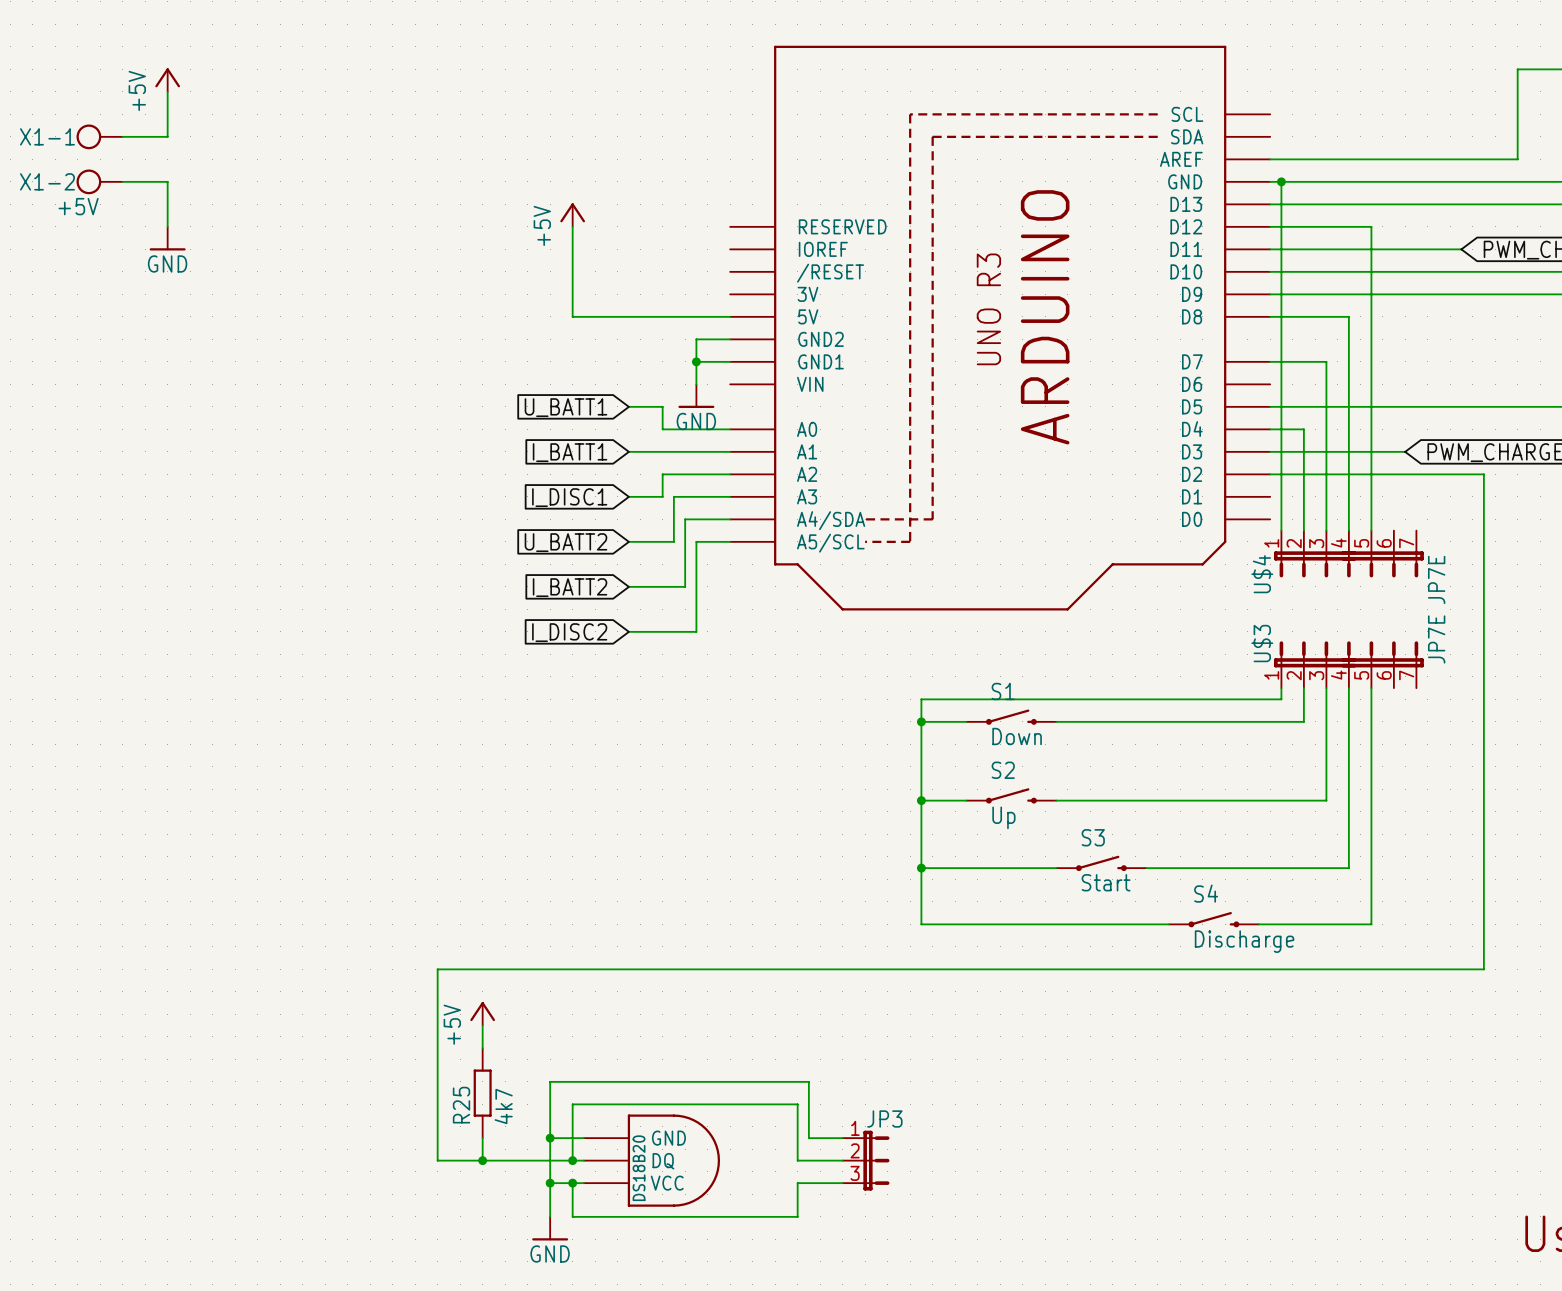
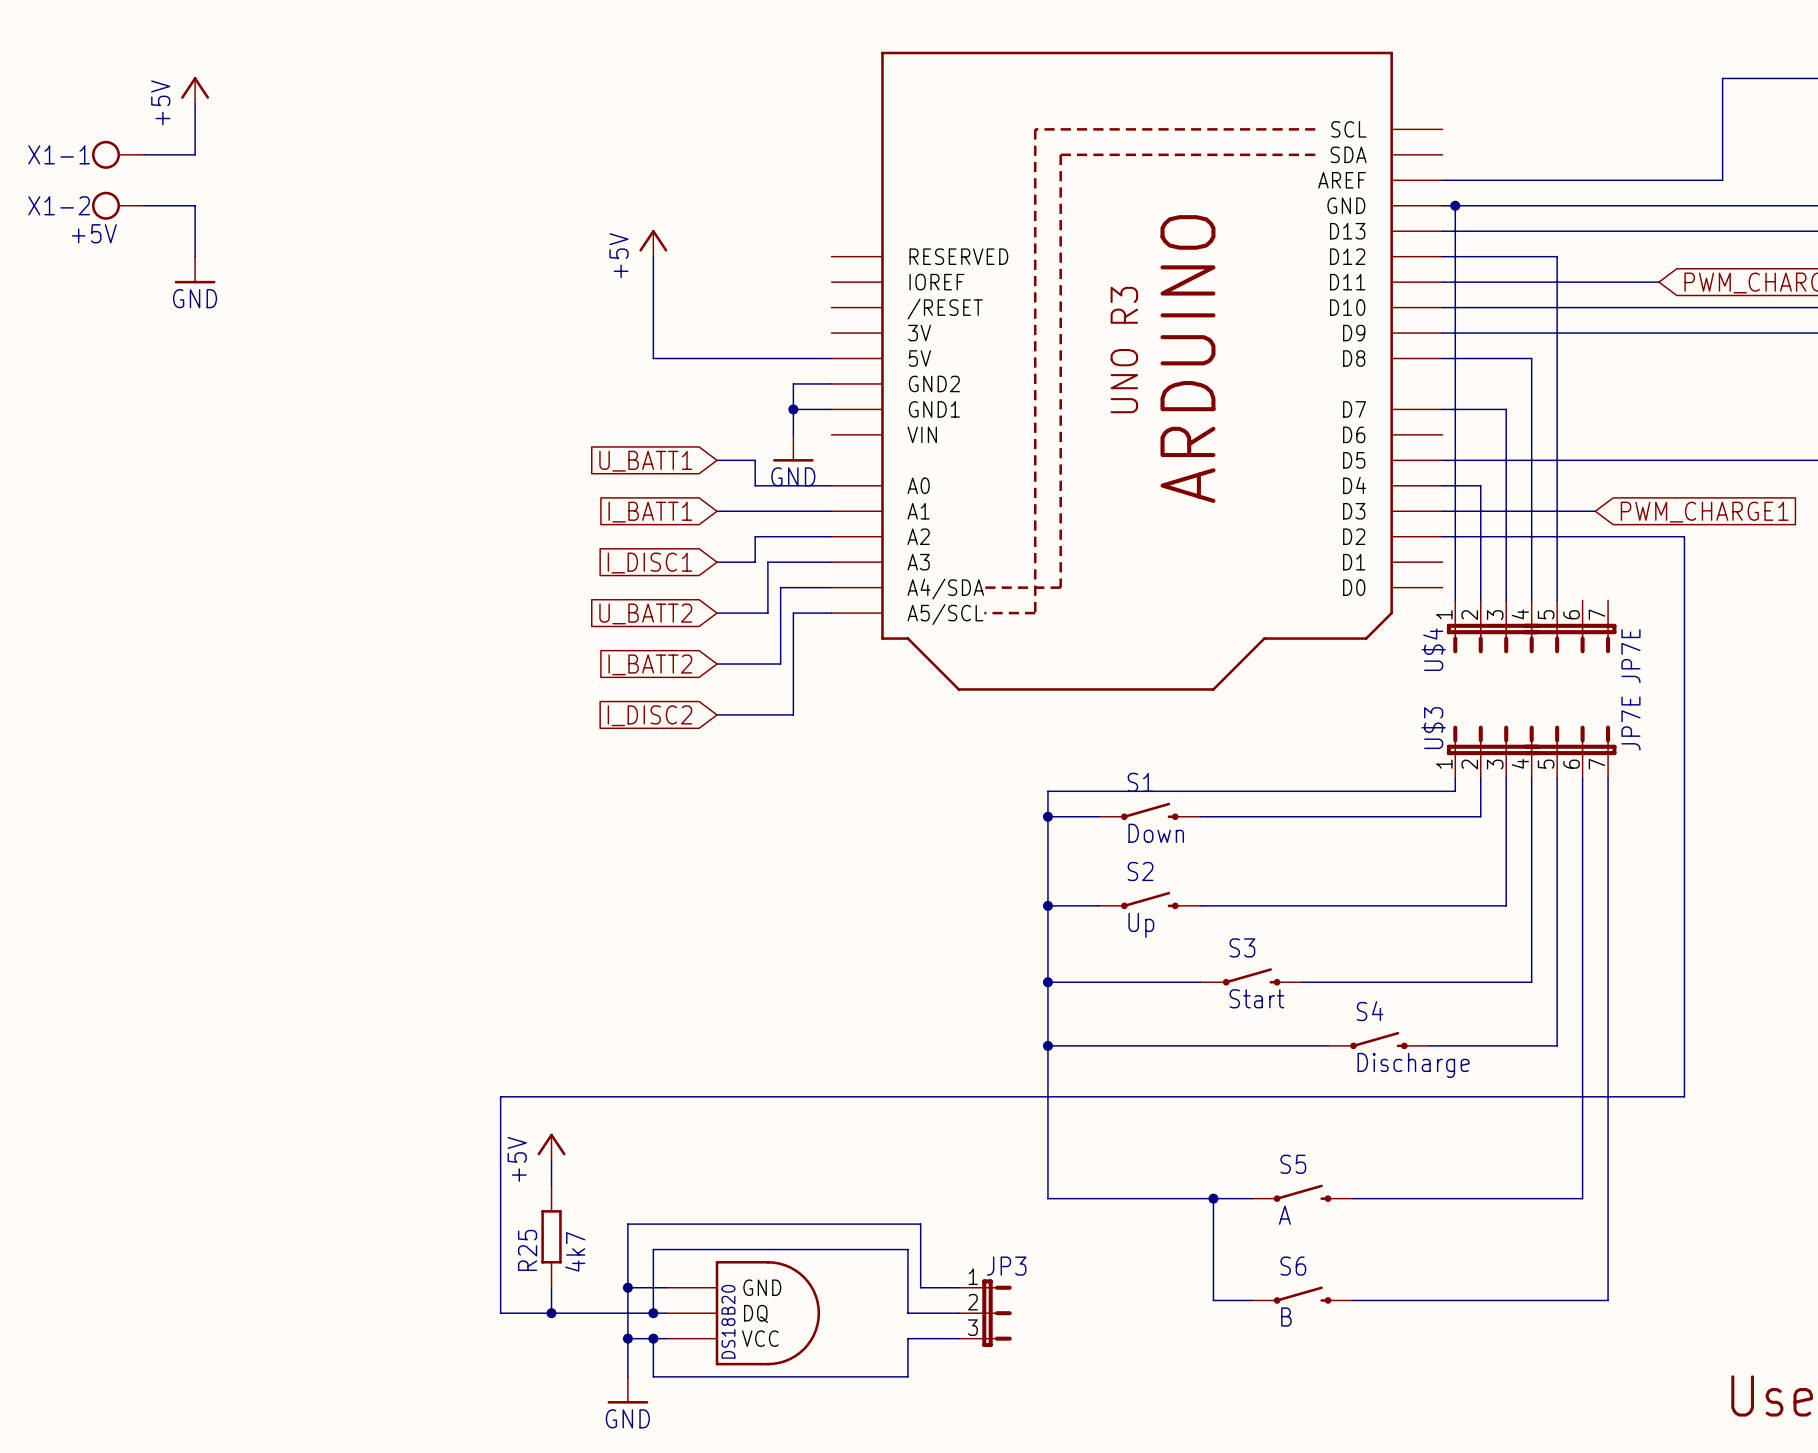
wire: none -> (1582, 778) (1582, 1198) (1353, 1198)
wire: none -> (1608, 778) (1608, 1300) (1353, 1300)
wire: none -> (1047, 1045) (1047, 1198) (1251, 1198)
junction: none -> (1047, 1045)
S5: none -> A (1302, 1193)
wire: none -> (1213, 1198) (1213, 1300) (1251, 1300)
junction: none -> (1213, 1198)
S6: none -> B (1302, 1295)

